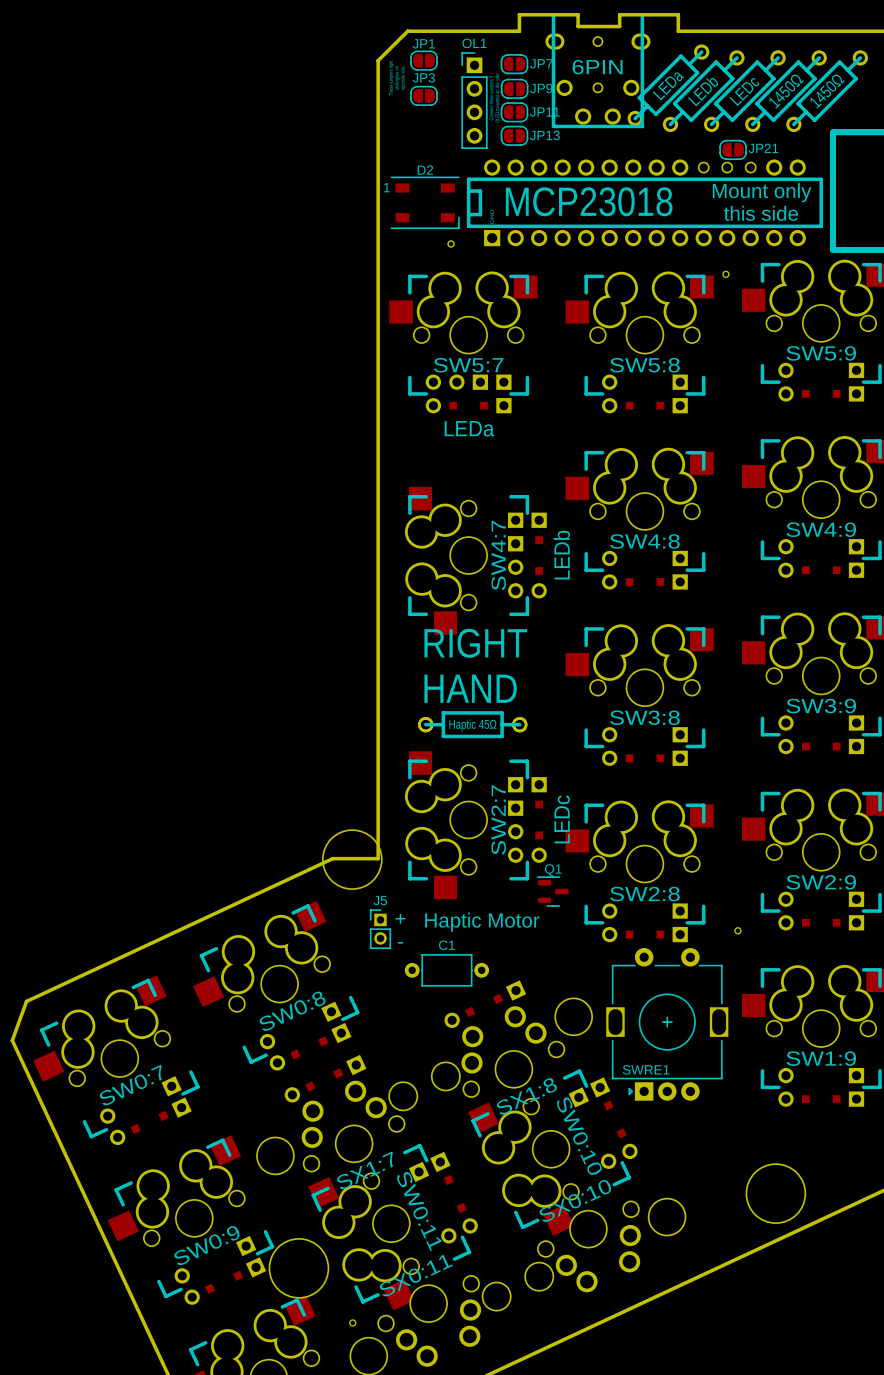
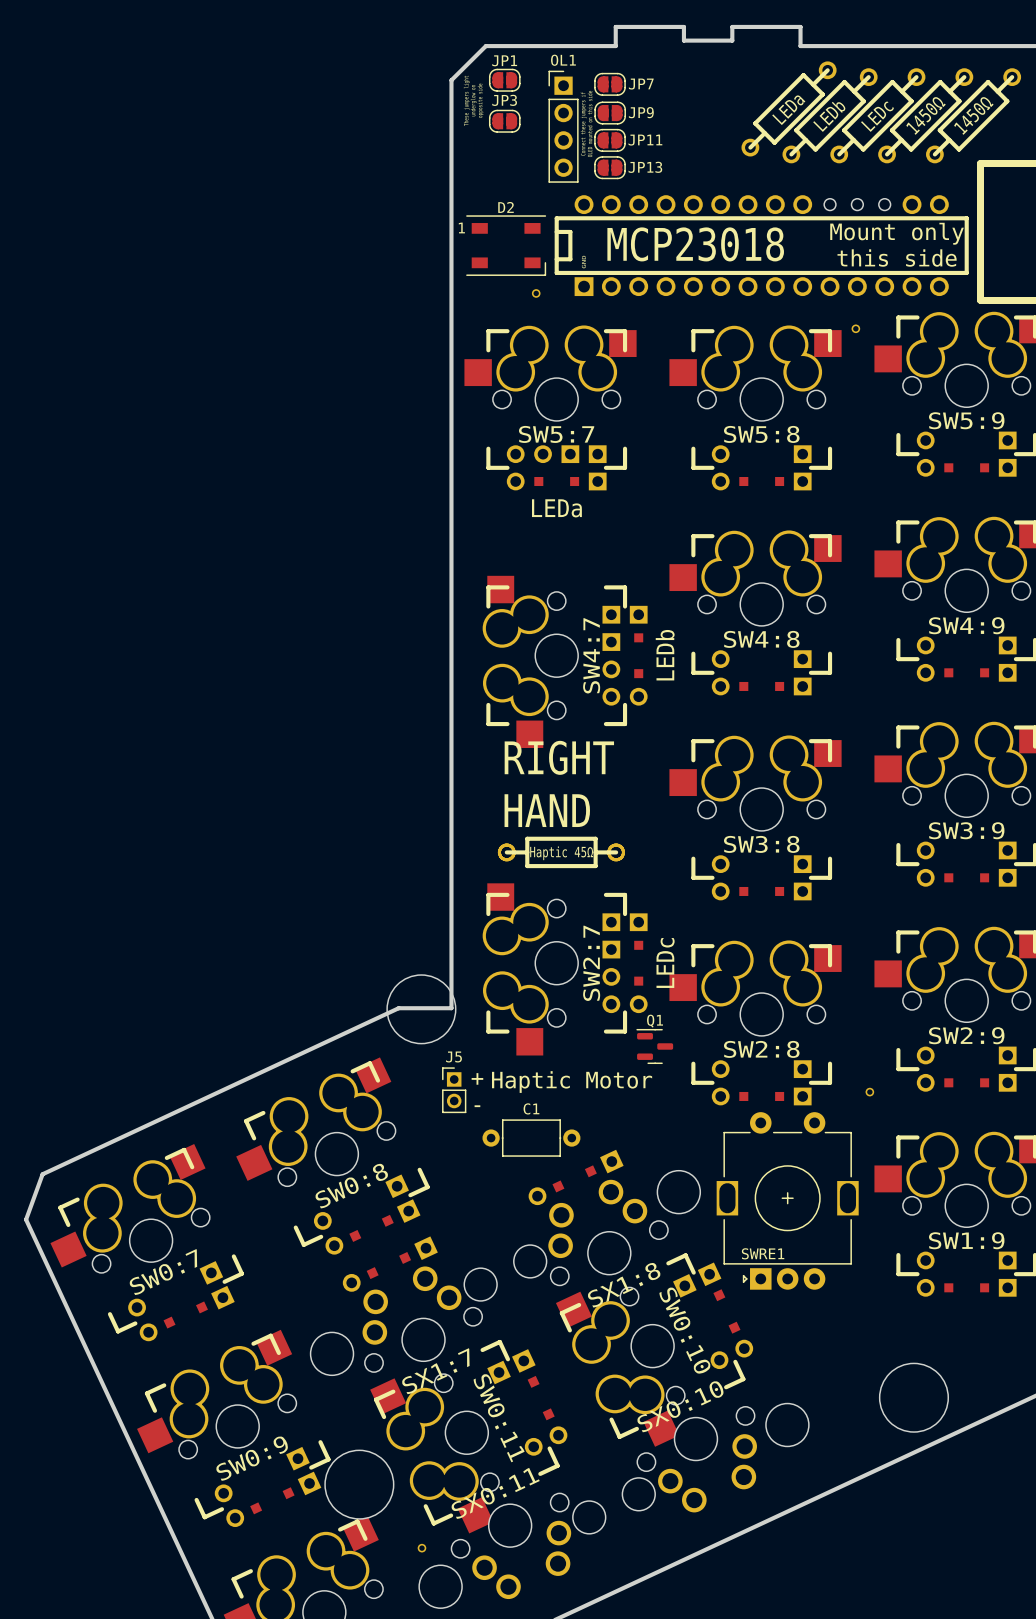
part: 6PIN (597, 70) -> none
JP21: (733, 149) -> none

